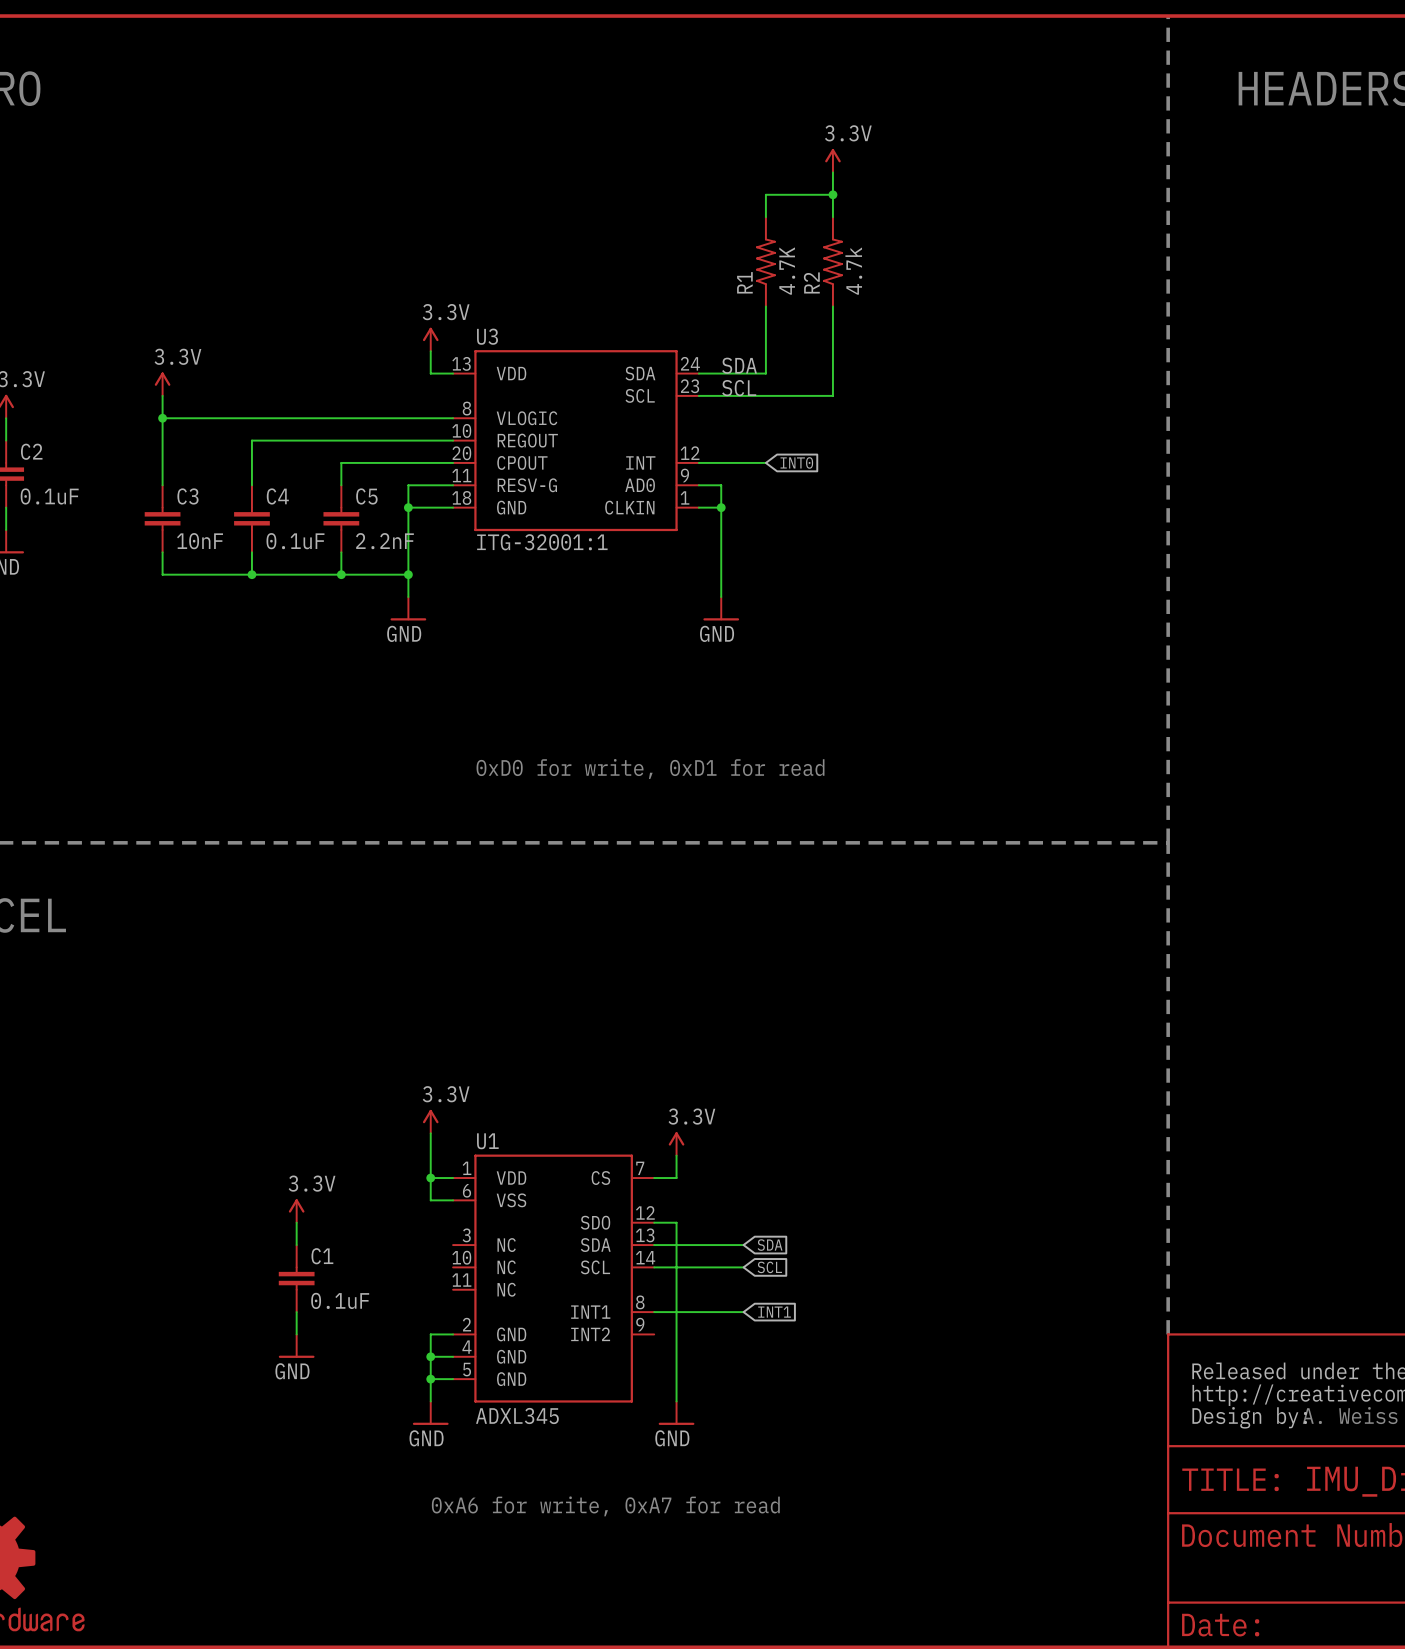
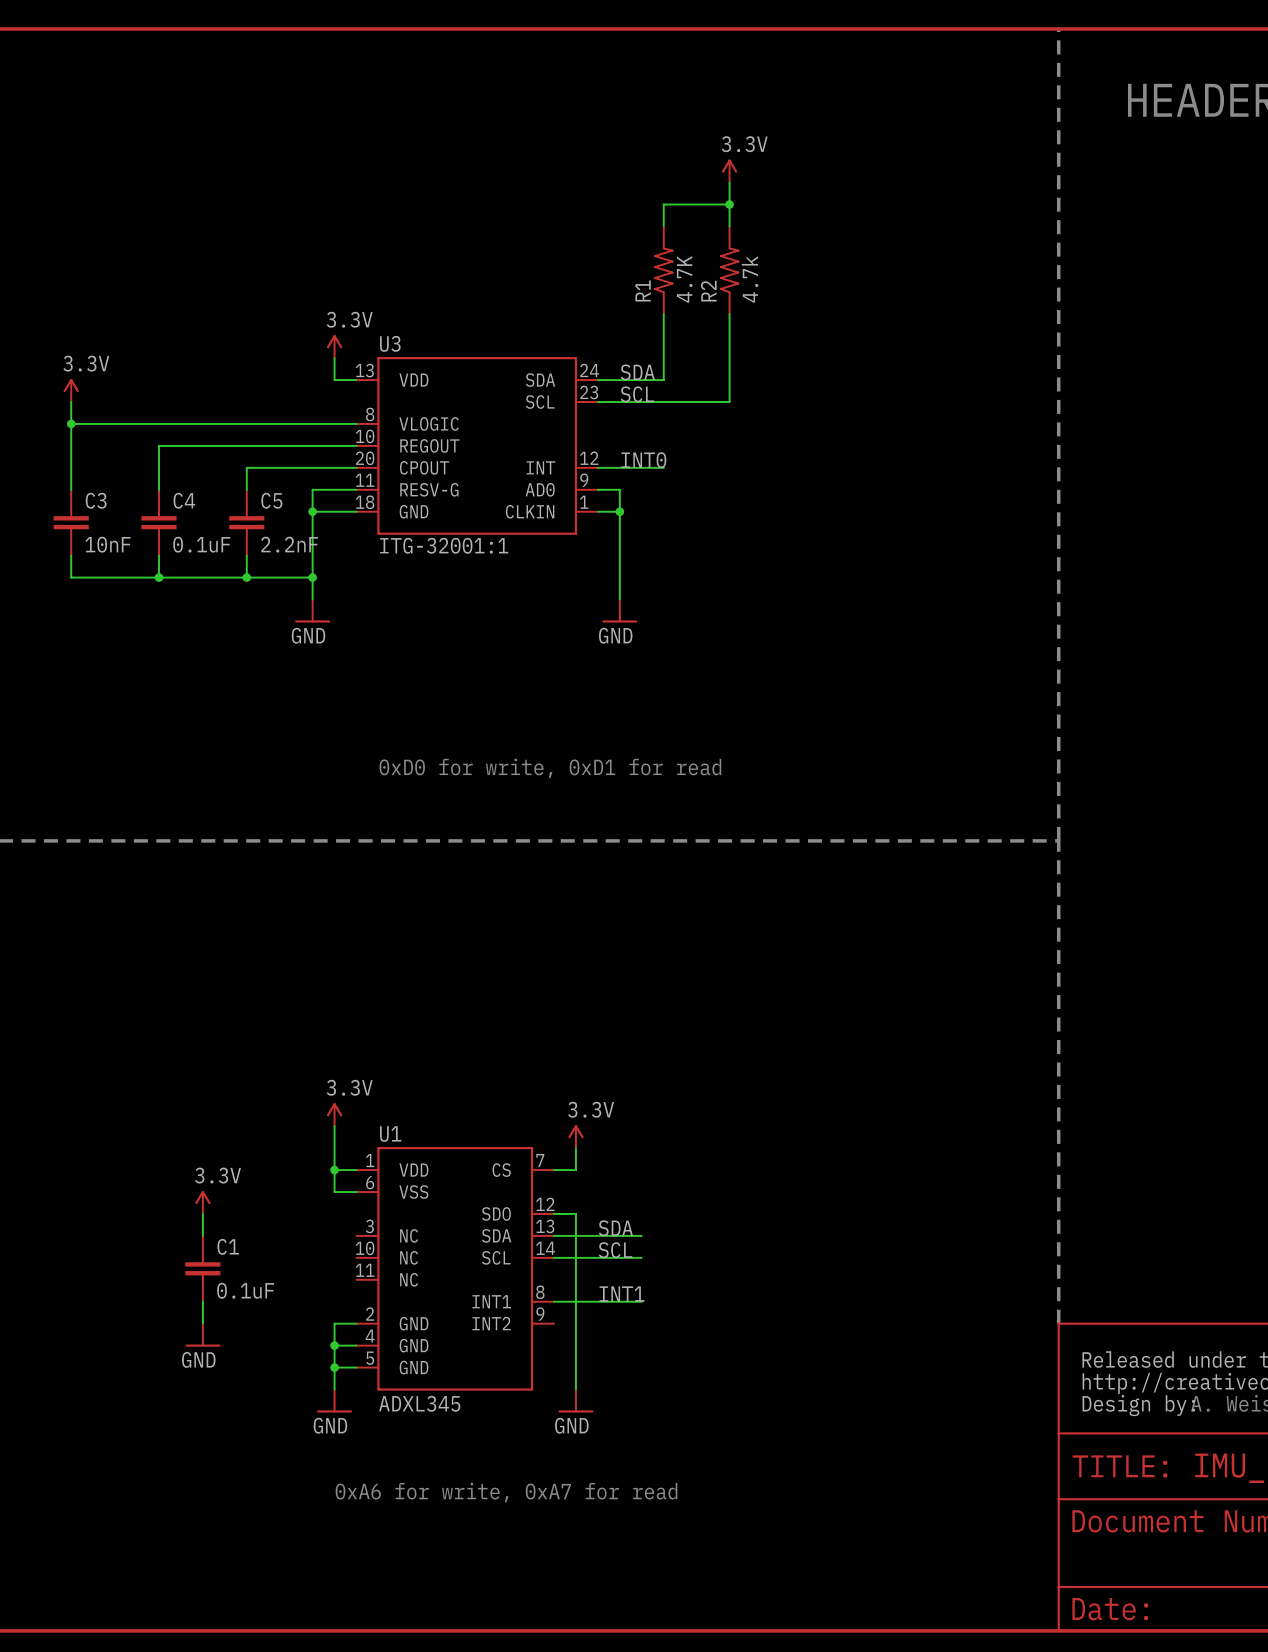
label: none -> INT0 (643, 460)
global label: INT0 (796, 462) -> none
label: none -> SDA (615, 1228)
global label: SDA (770, 1245) -> none
label: none -> SCL (615, 1250)
global label: SCL (769, 1267) -> none
label: none -> INT1 (622, 1294)
global label: INT1 (774, 1312) -> none

